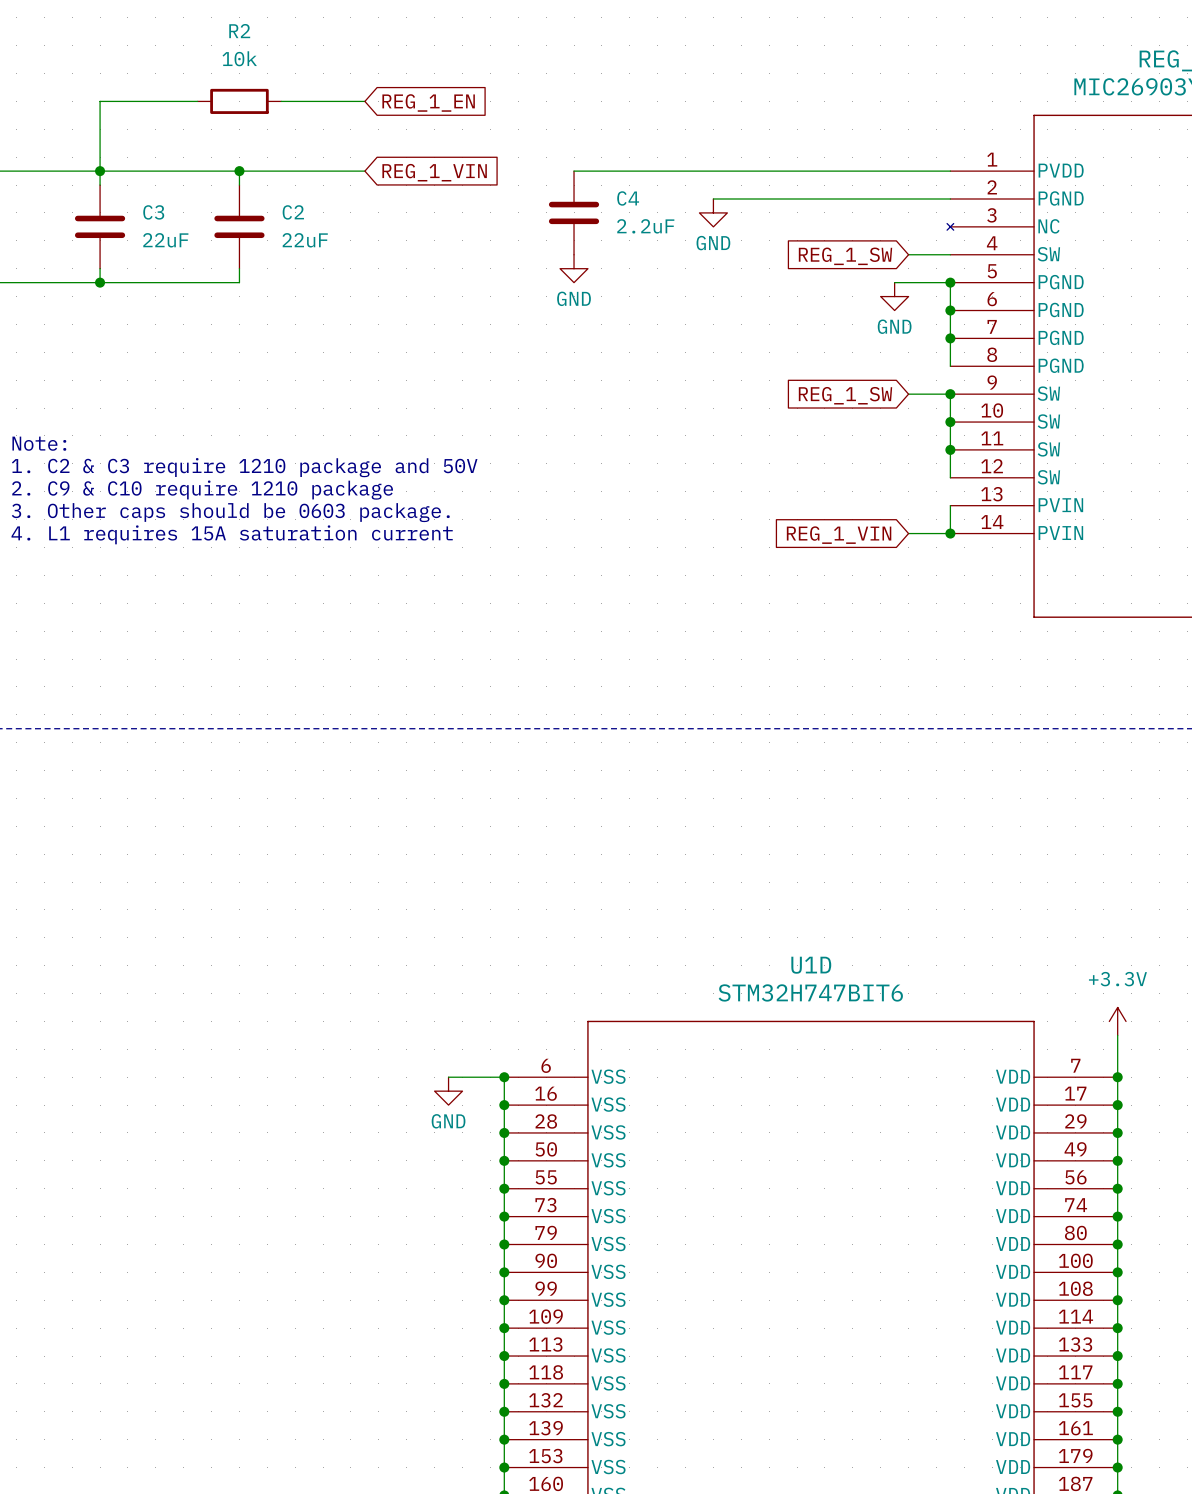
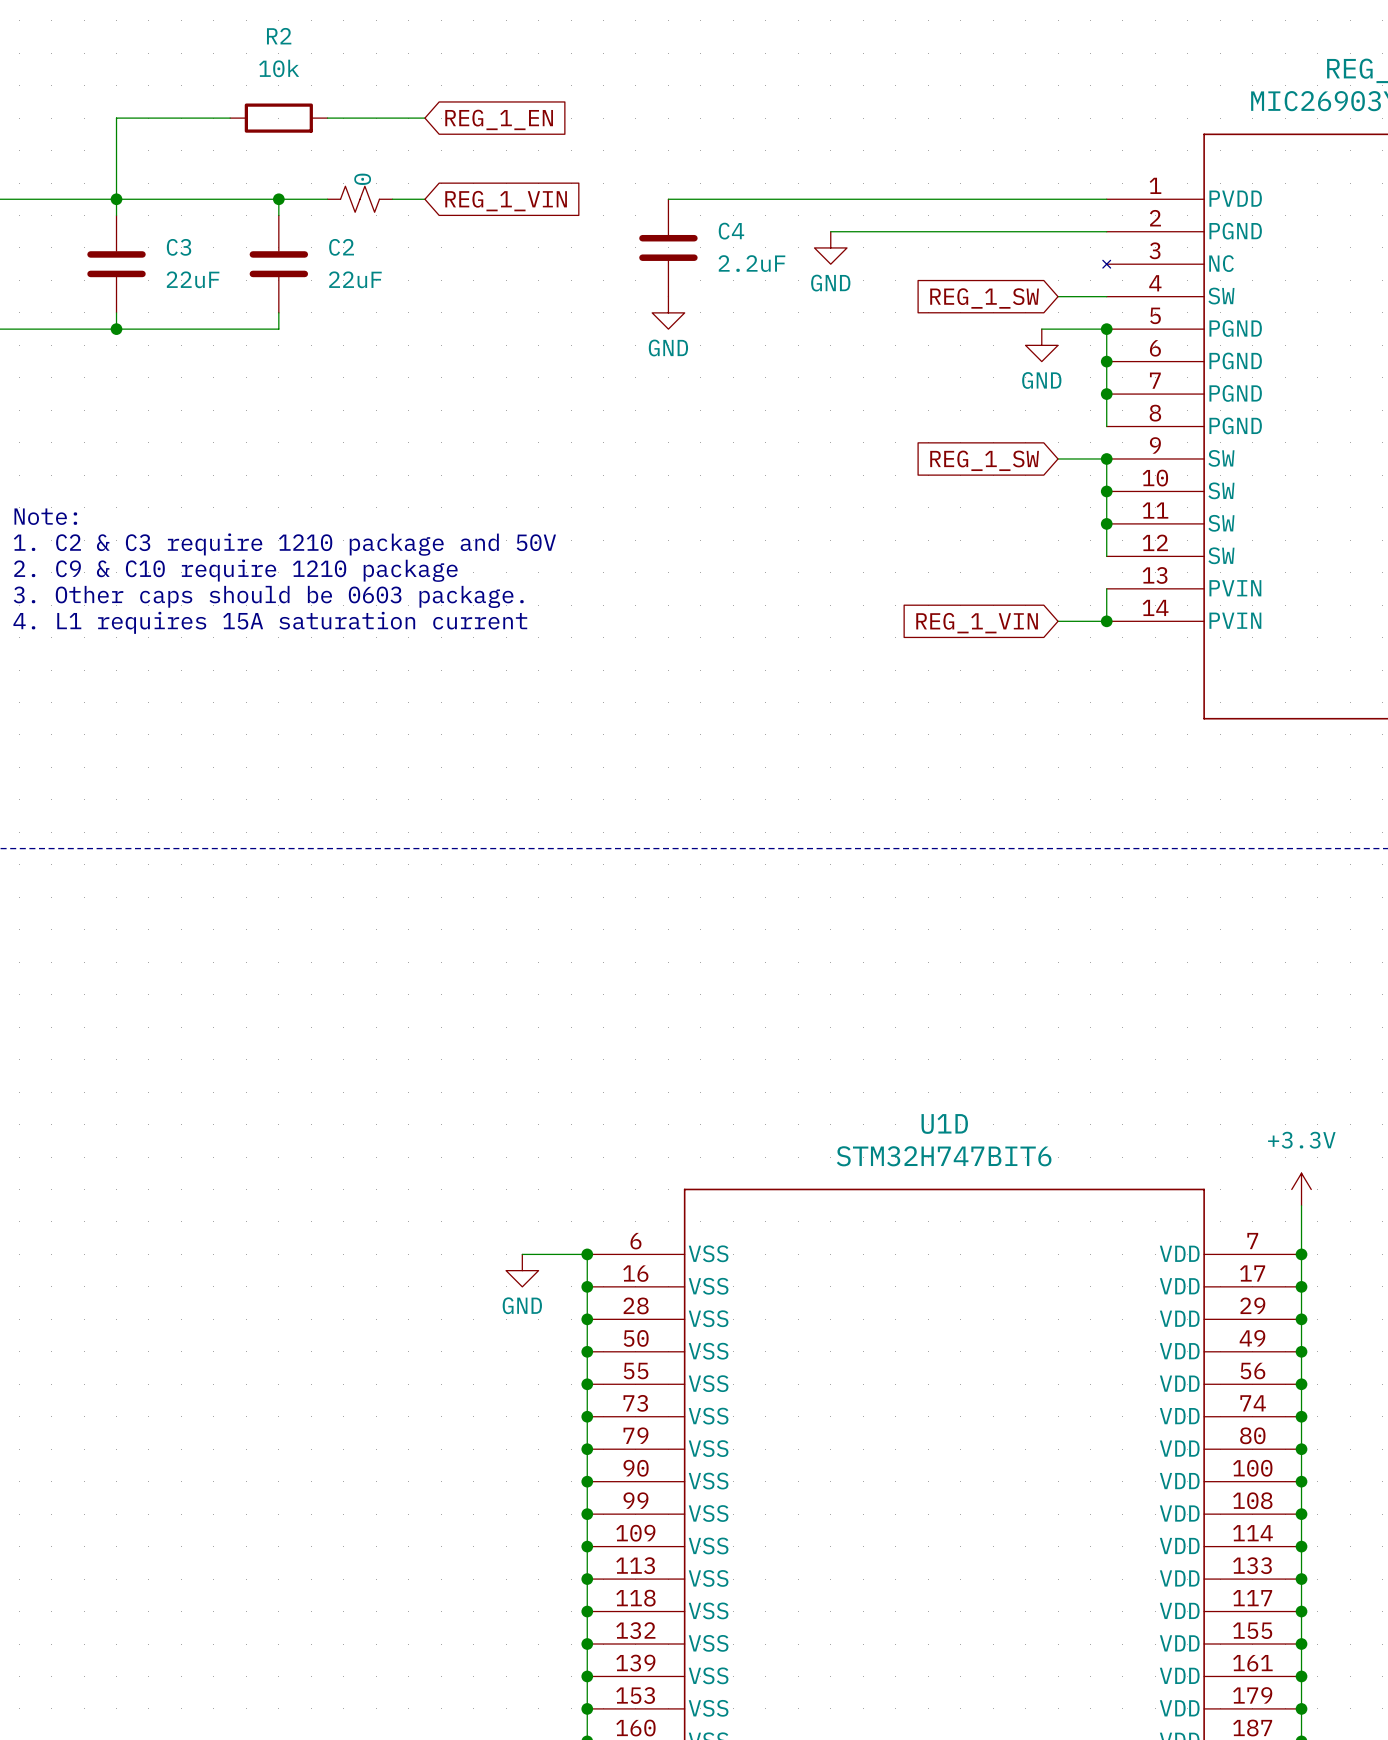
part: none -> 0 (360, 199)

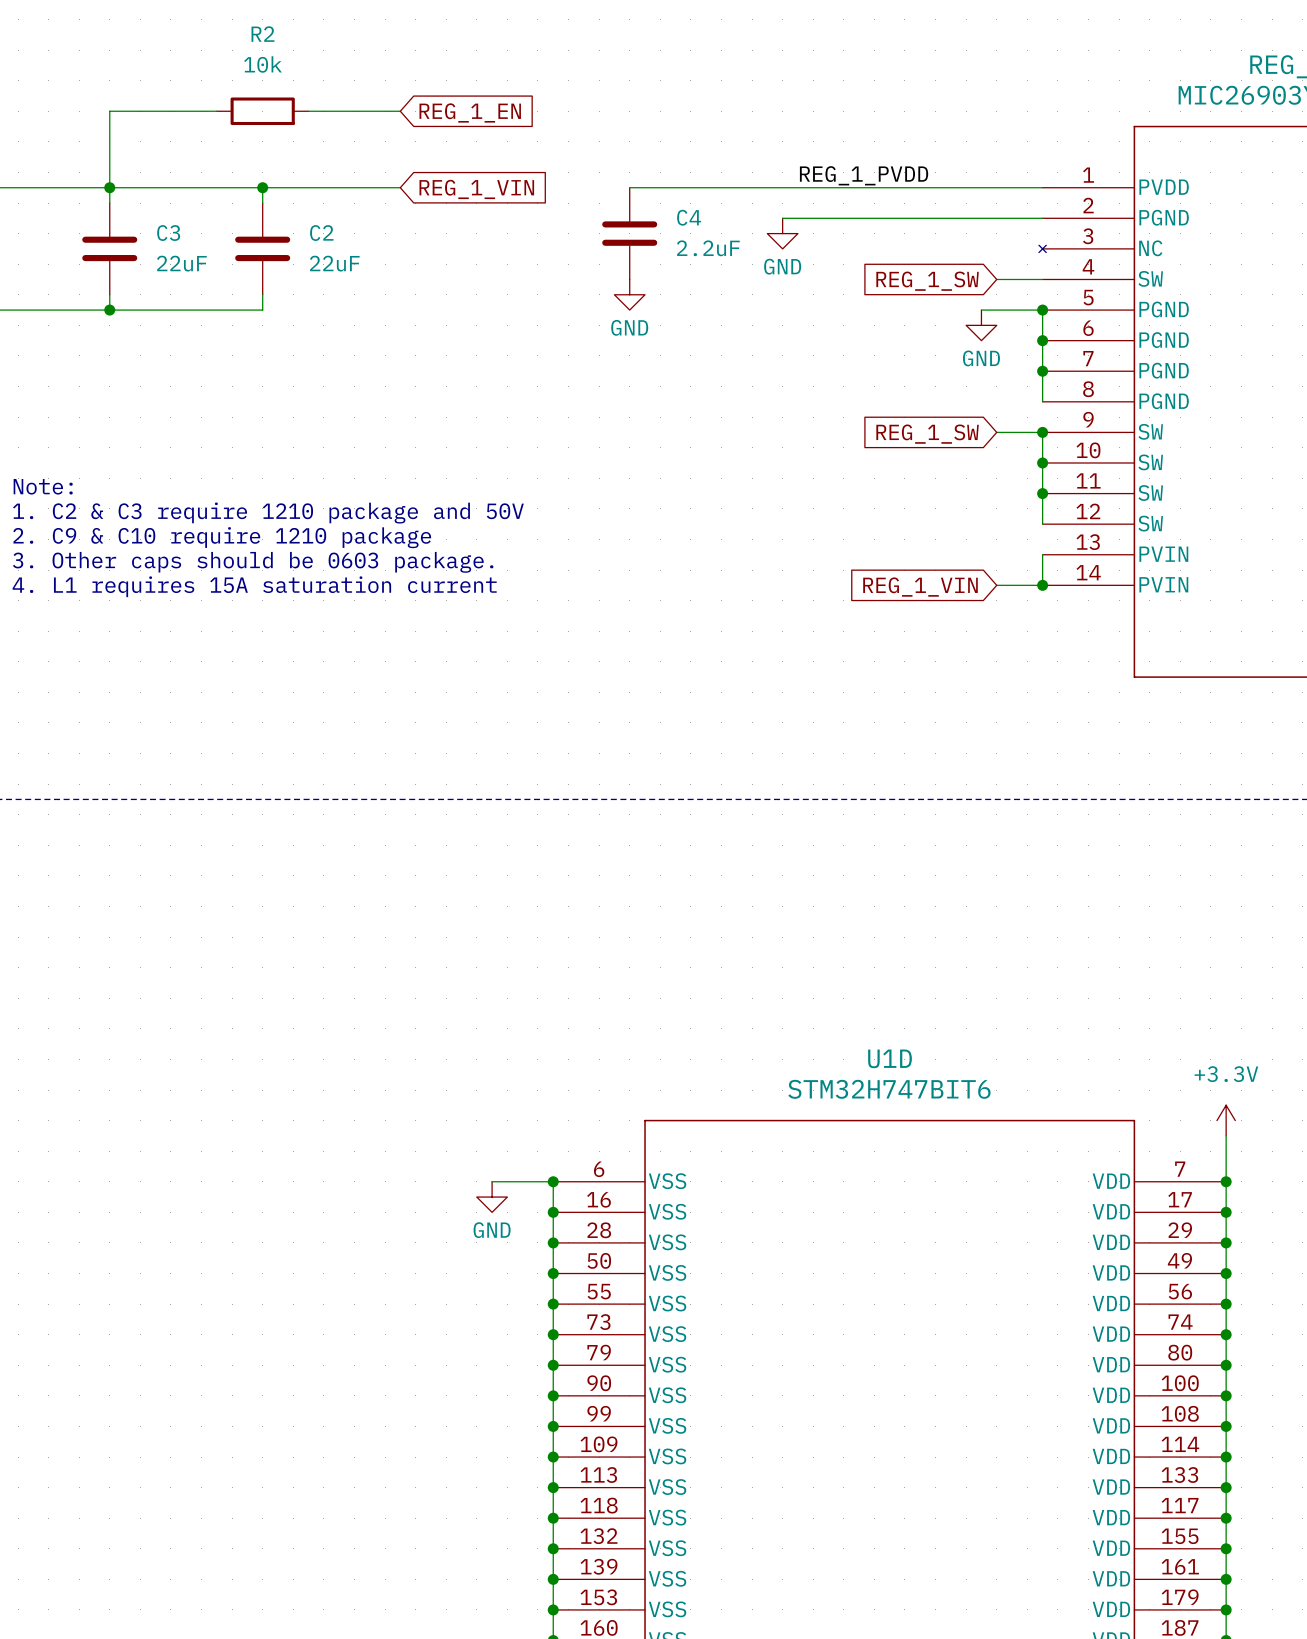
label: none -> REG_1_PVDD (864, 175)
wire: none -> (308, 187) (369, 187)
part: 0 (360, 199) -> none

